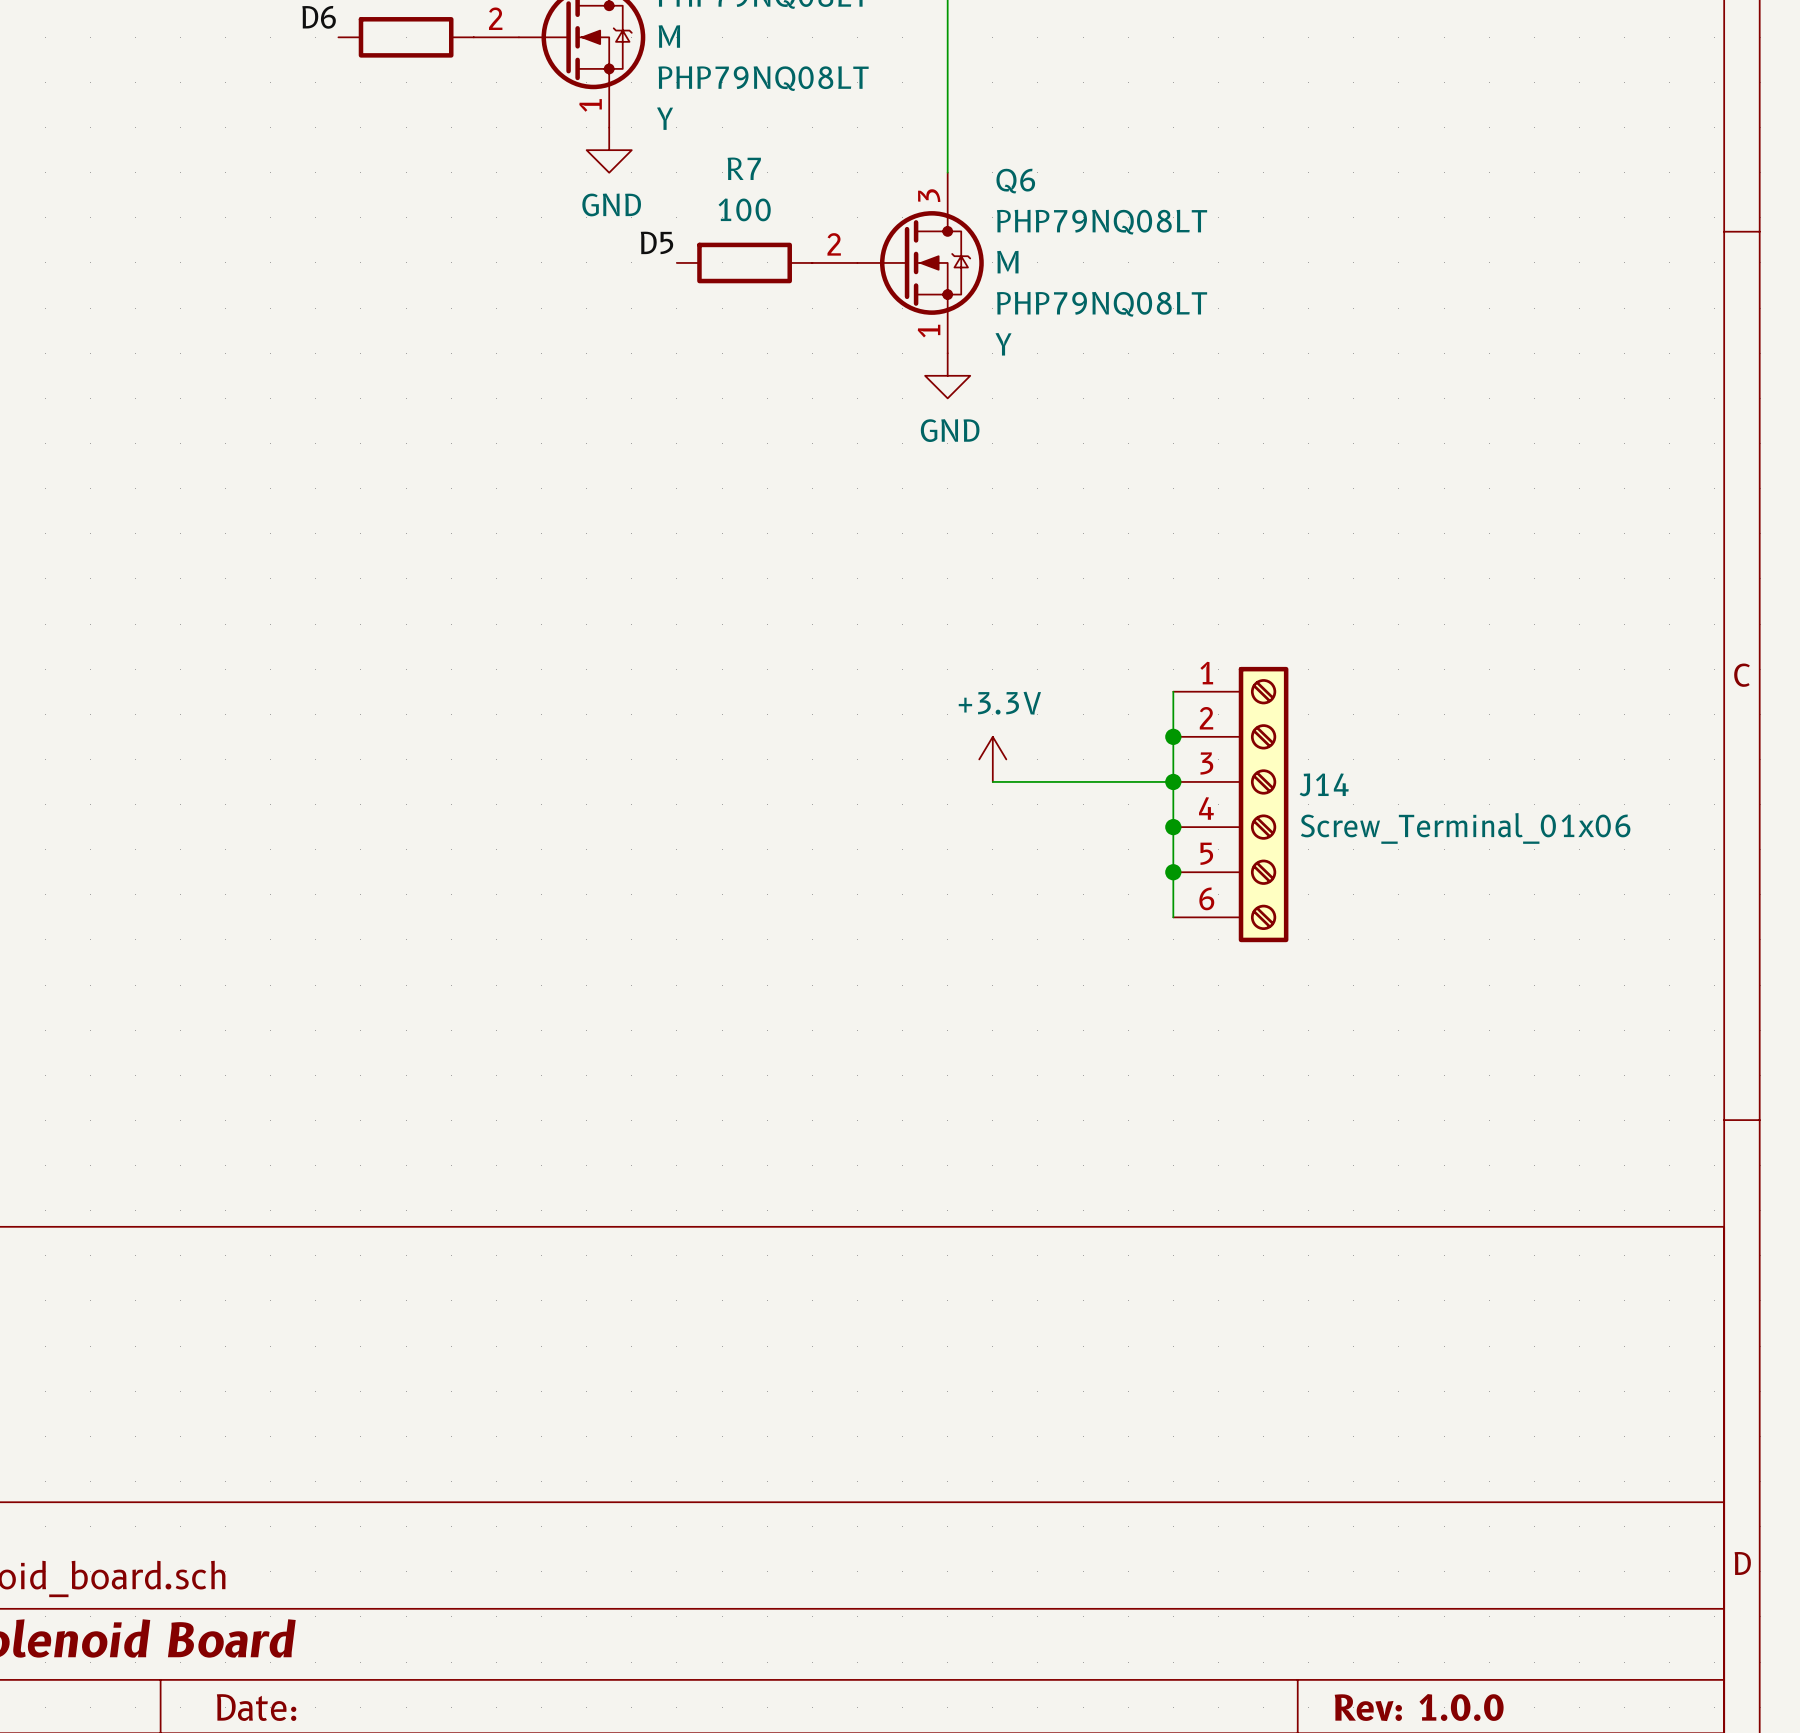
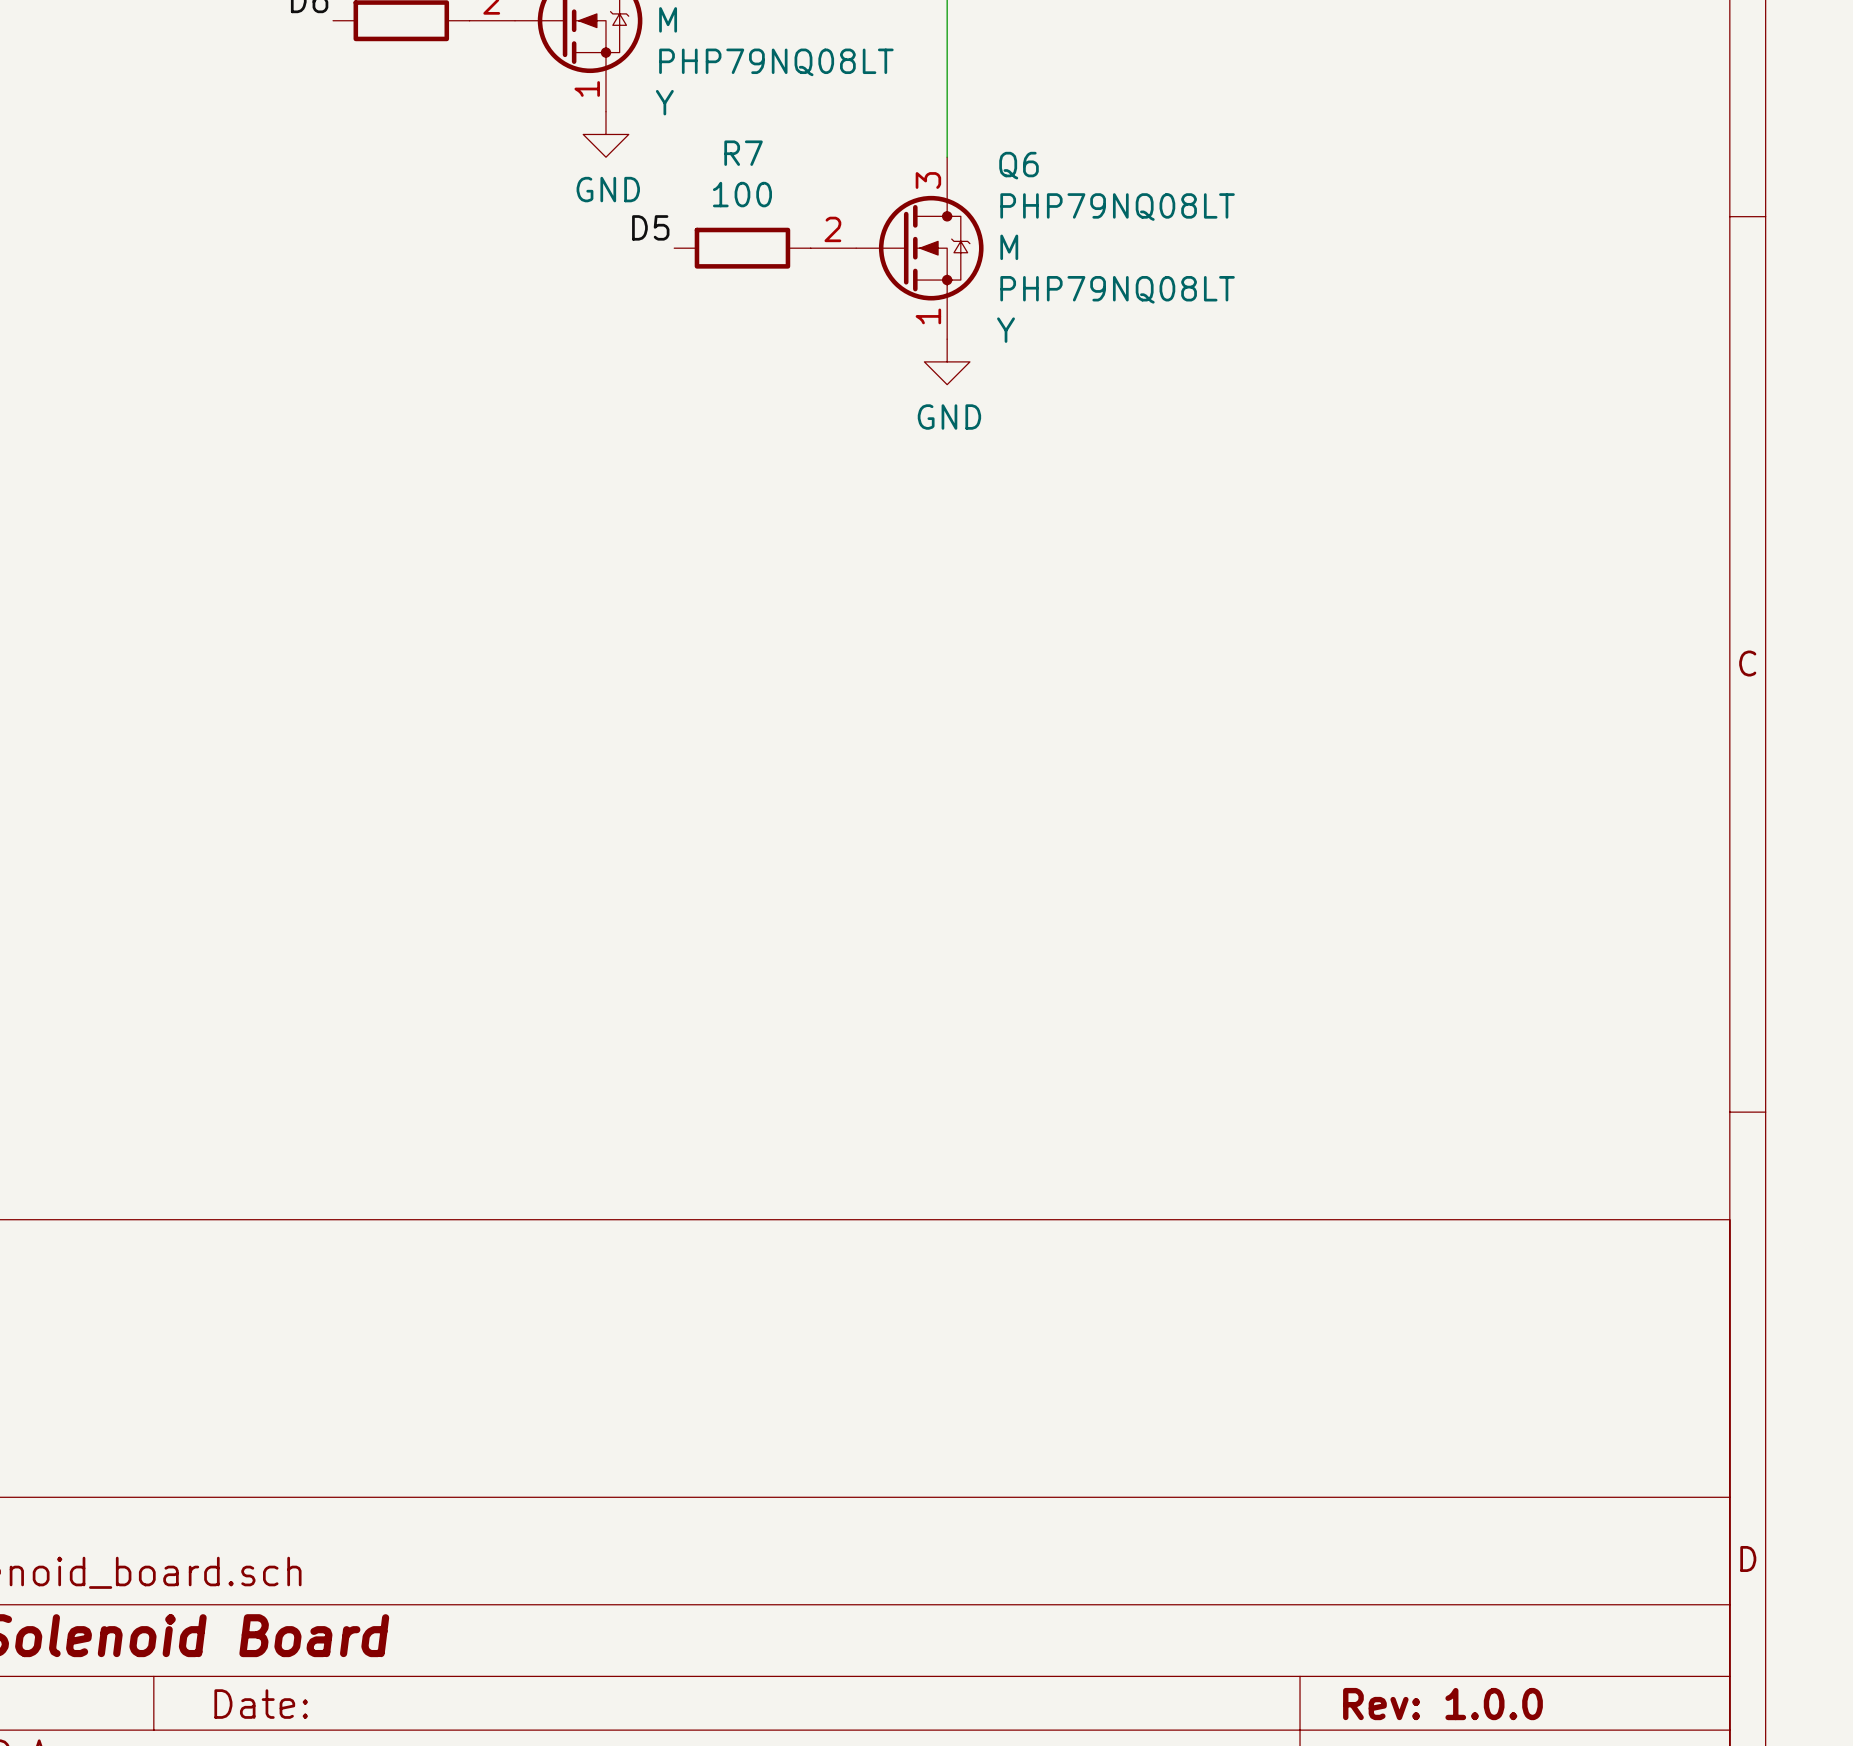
wire: (1173, 691) (1173, 917) -> none
junction: (1173, 736) -> none
power symbol: +3.3V (992, 759) -> none
wire: (992, 781) (1173, 781) -> none
junction: (1173, 781) -> none
J14: Screw_Terminal_01x06 (1230, 804) -> none
junction: (1173, 827) -> none
junction: (1173, 872) -> none

